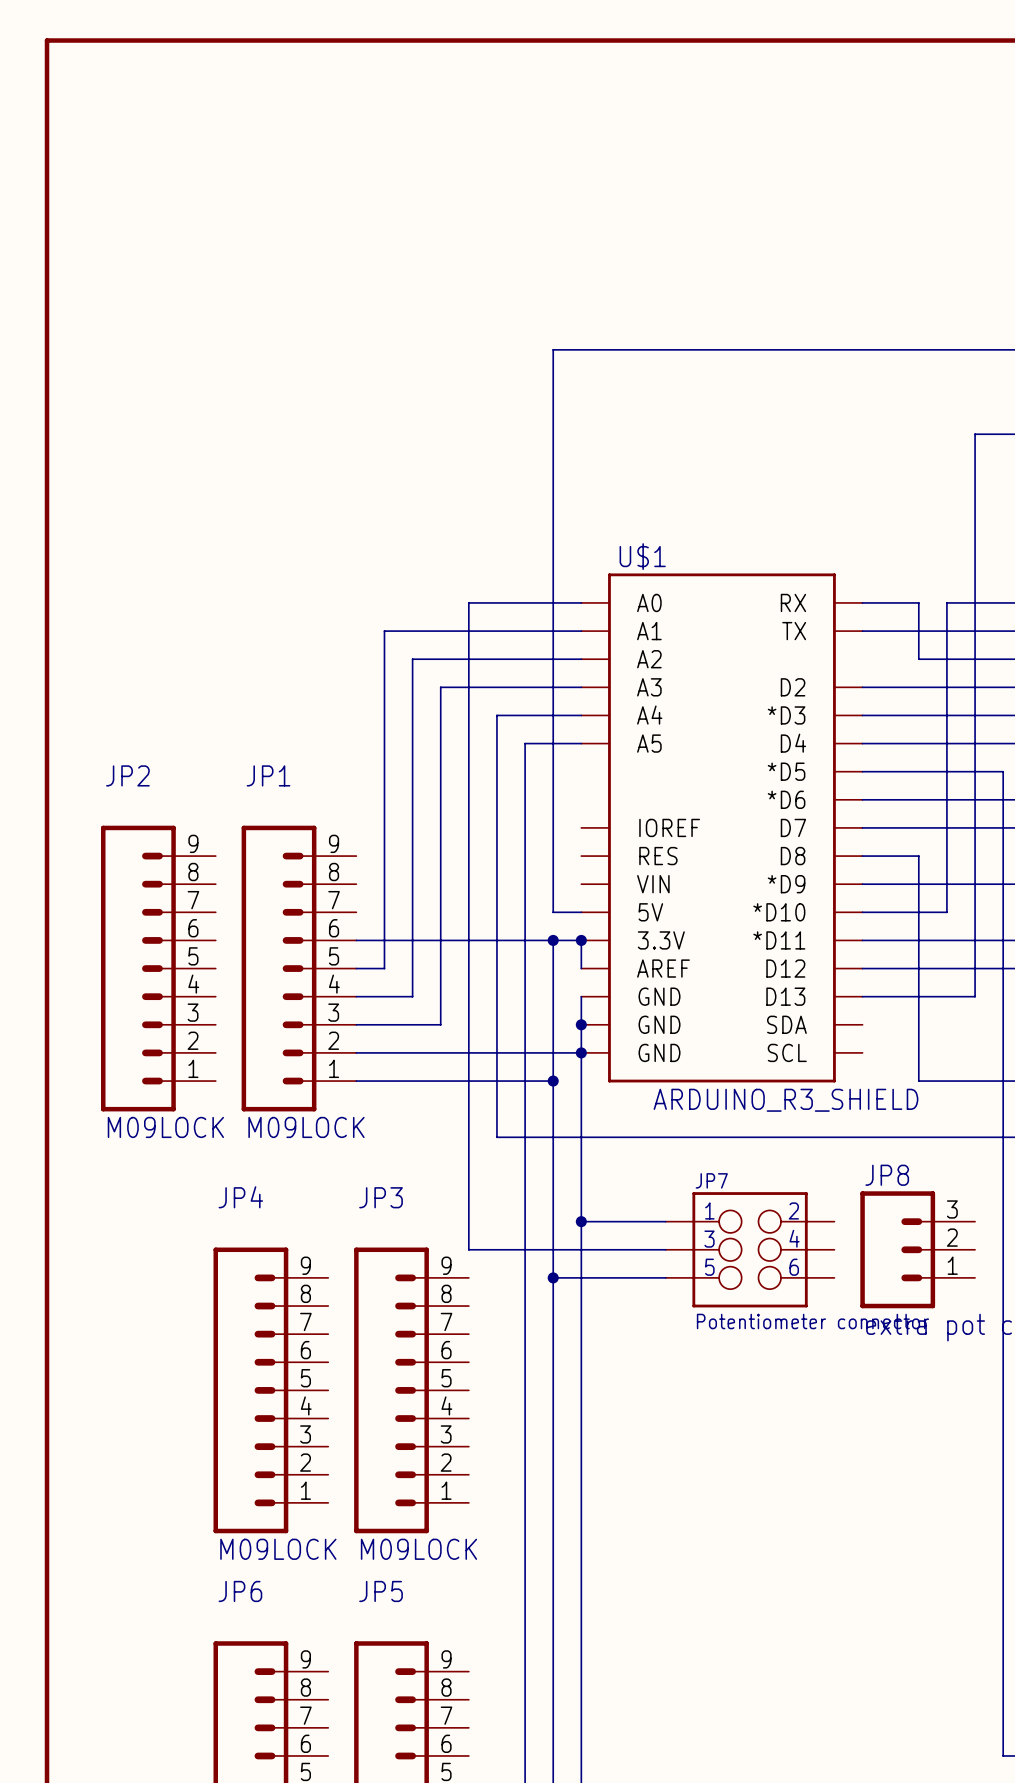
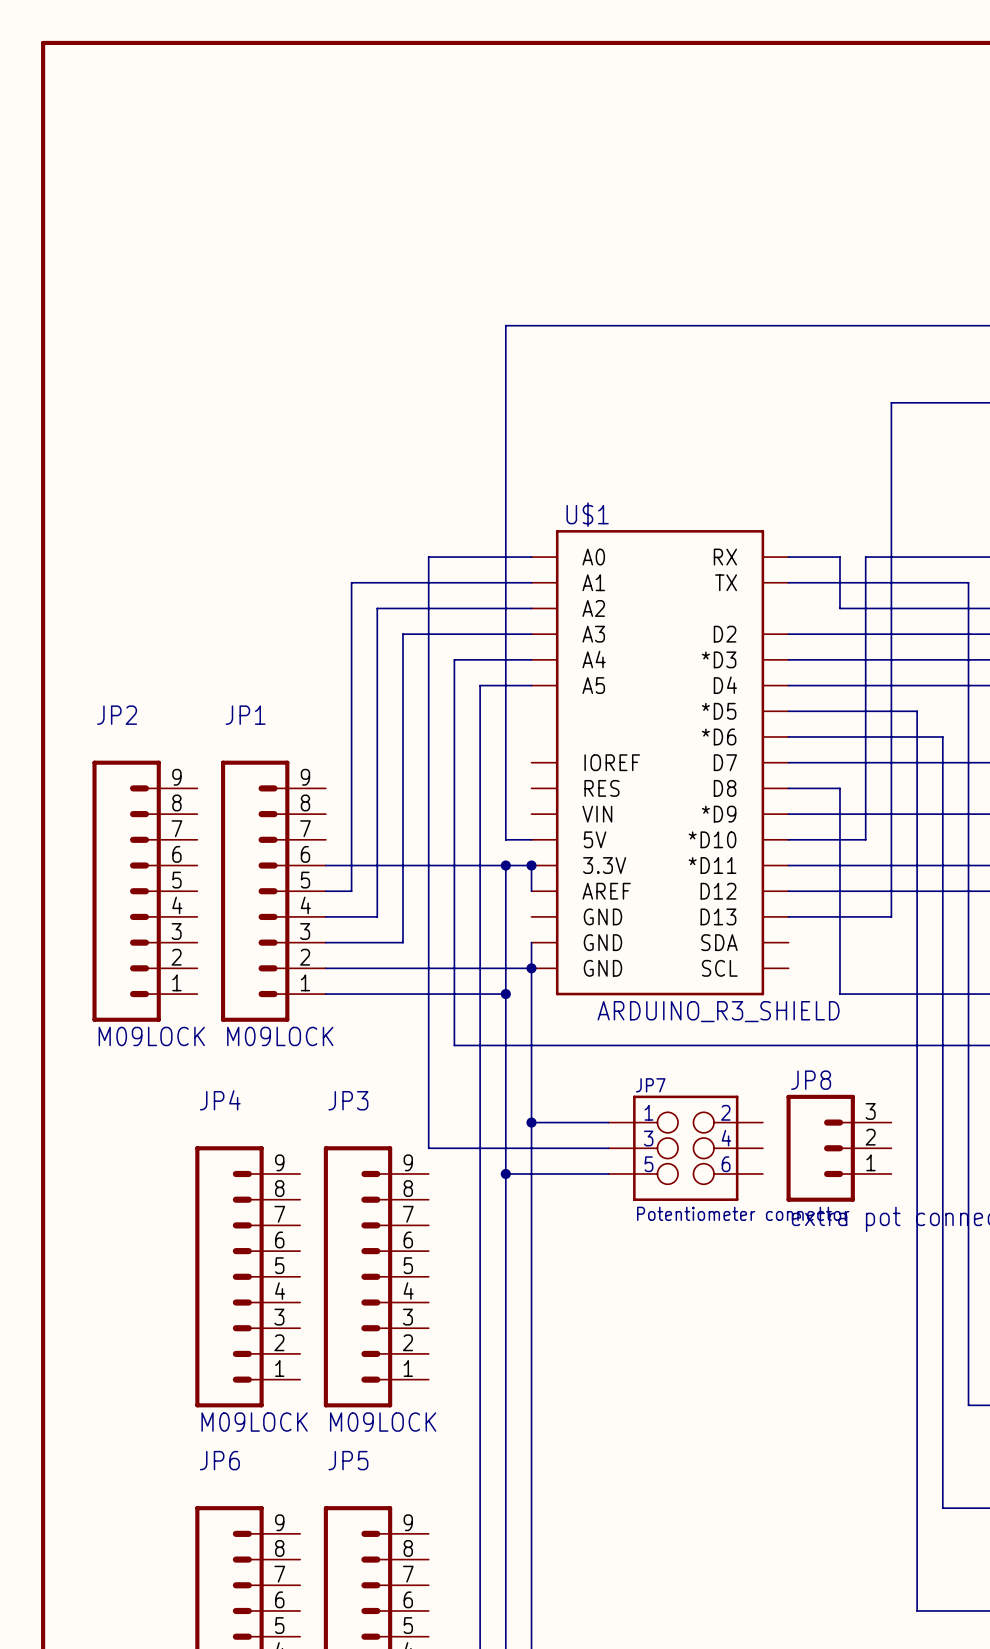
wire: (581, 996) (581, 1024) -> none
junction: (581, 1024) -> none

